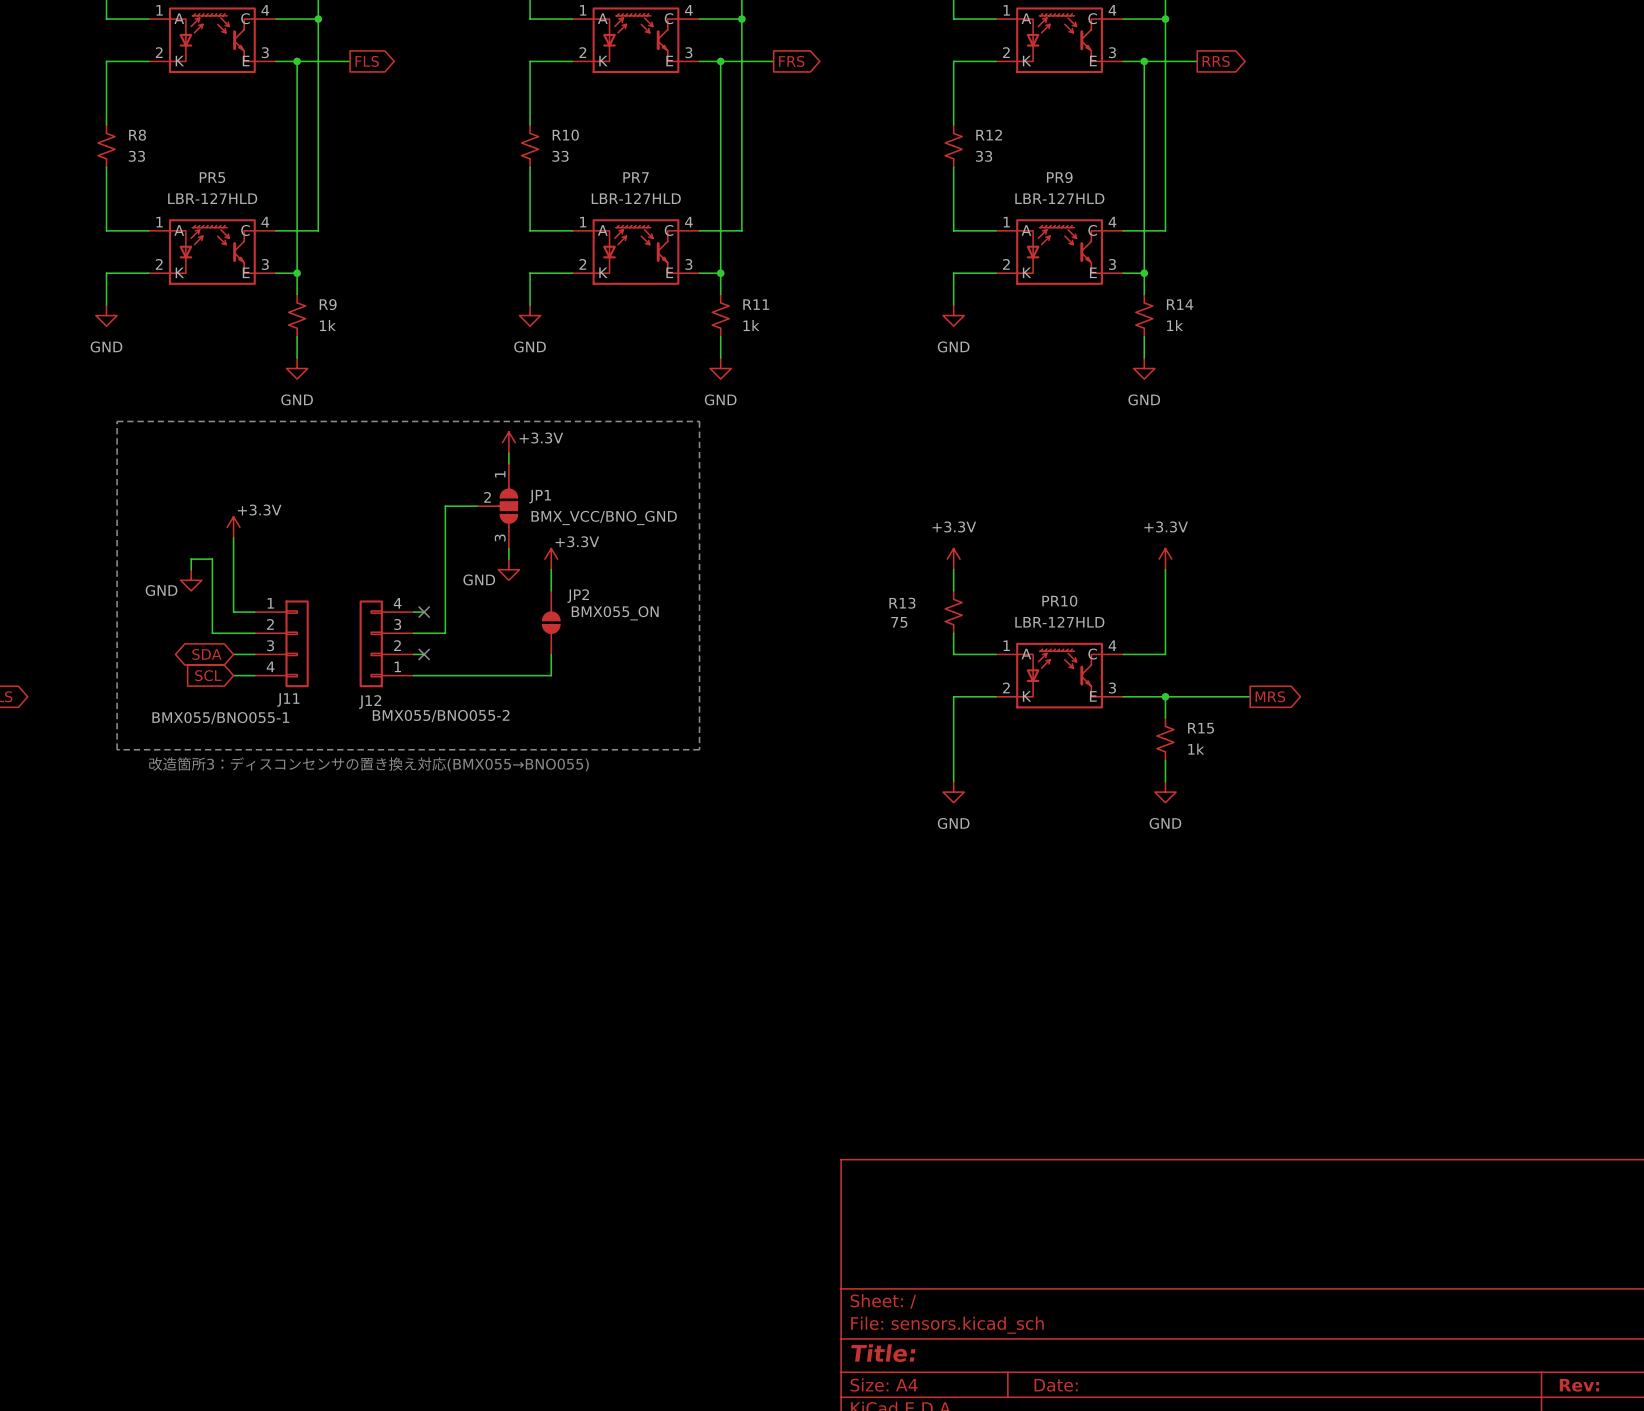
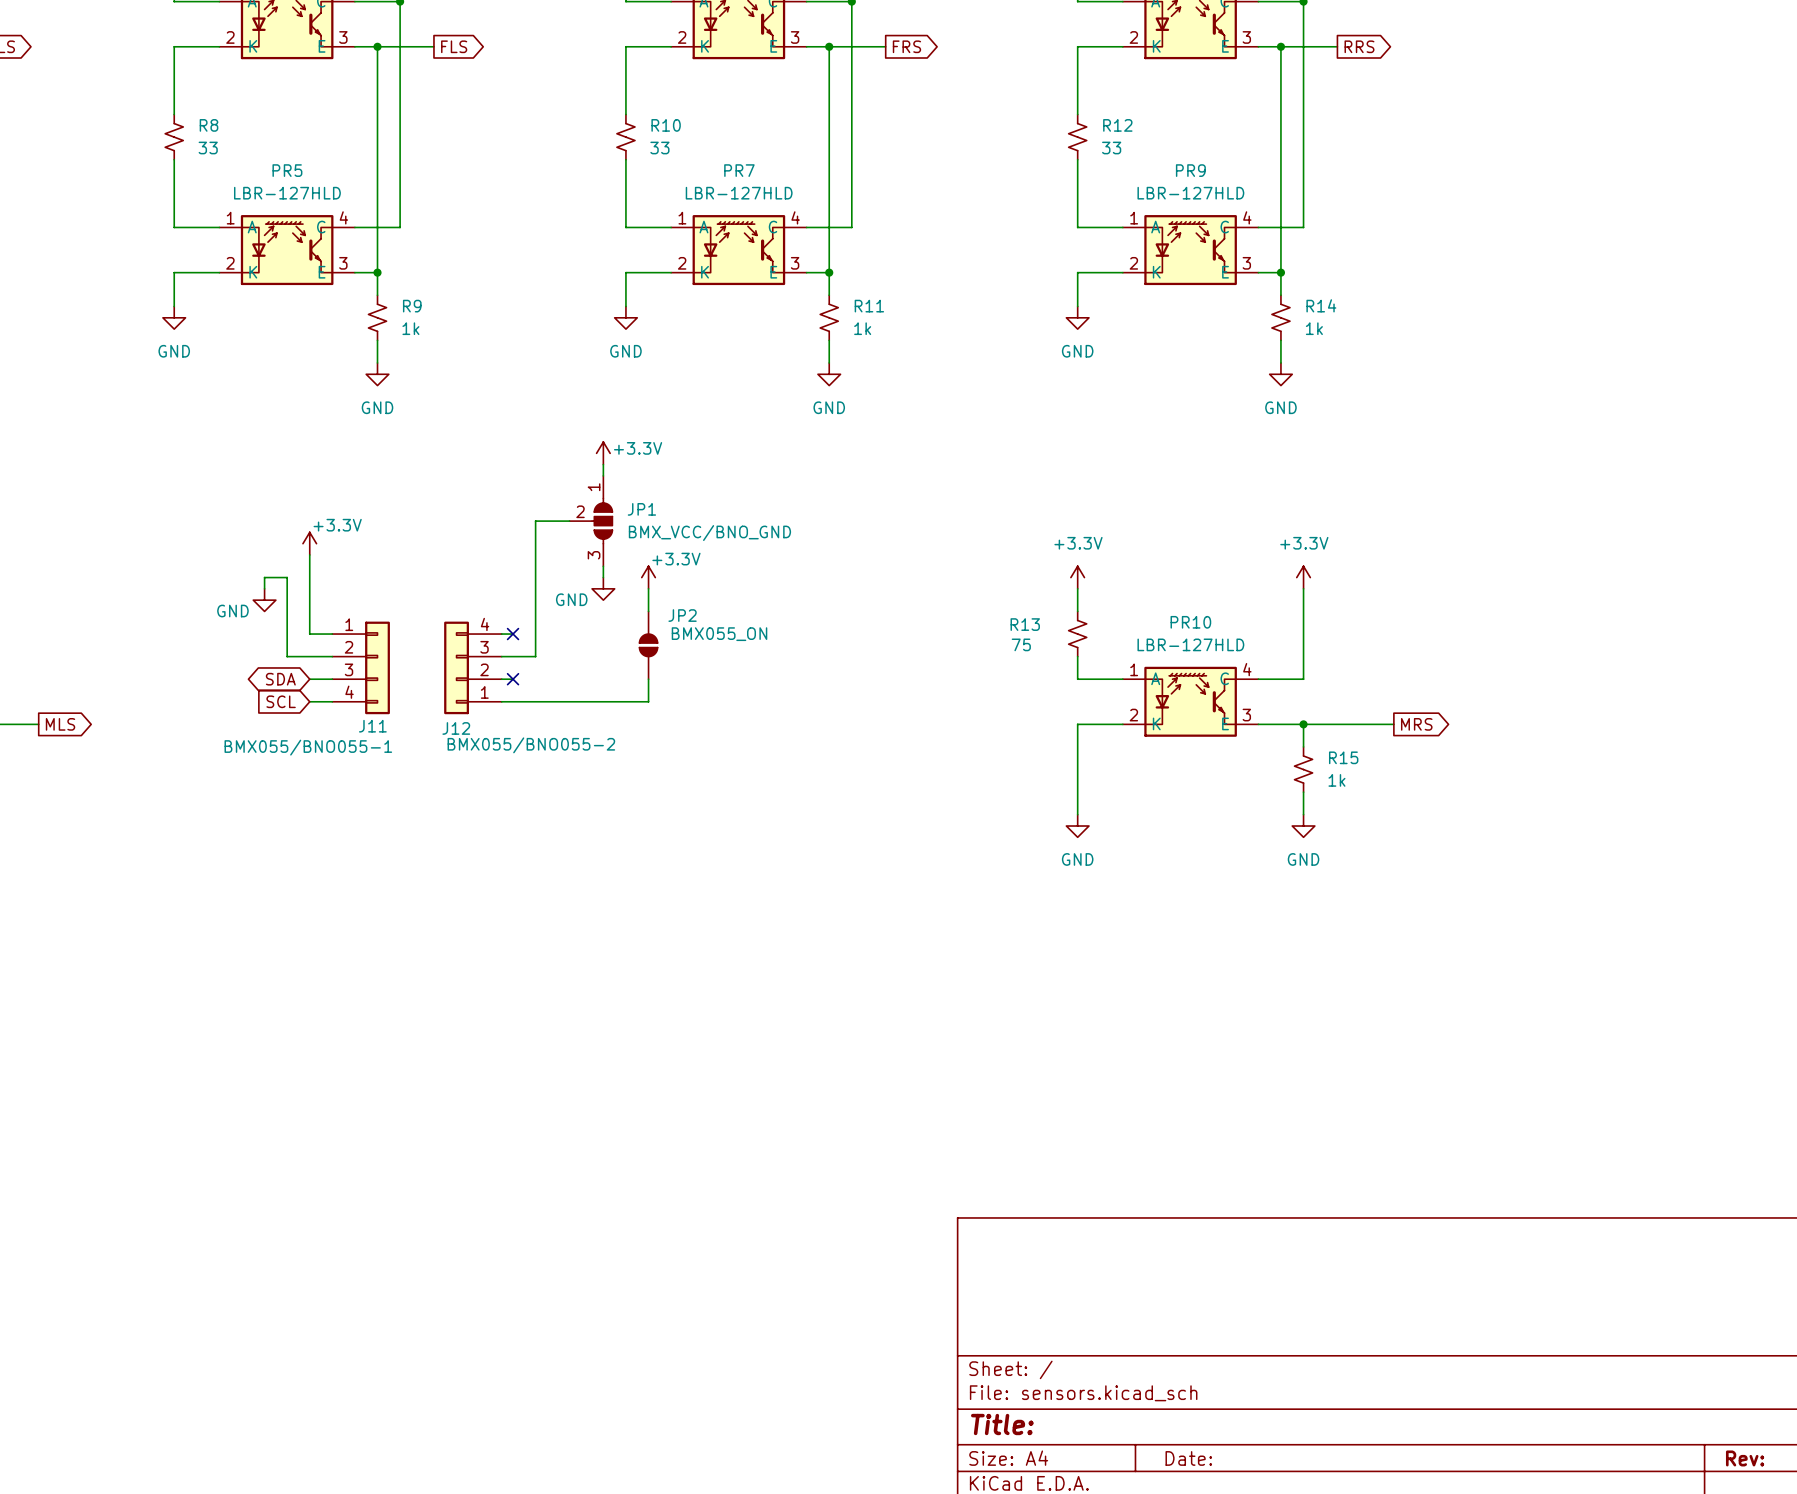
line: (117, 421) (699, 421) (699, 749) (117, 749) (117, 421) -> none
text: 改造箇所3：ディスコンセンサの置き換え対応(BMX055→BNO055) (368, 764) -> none

